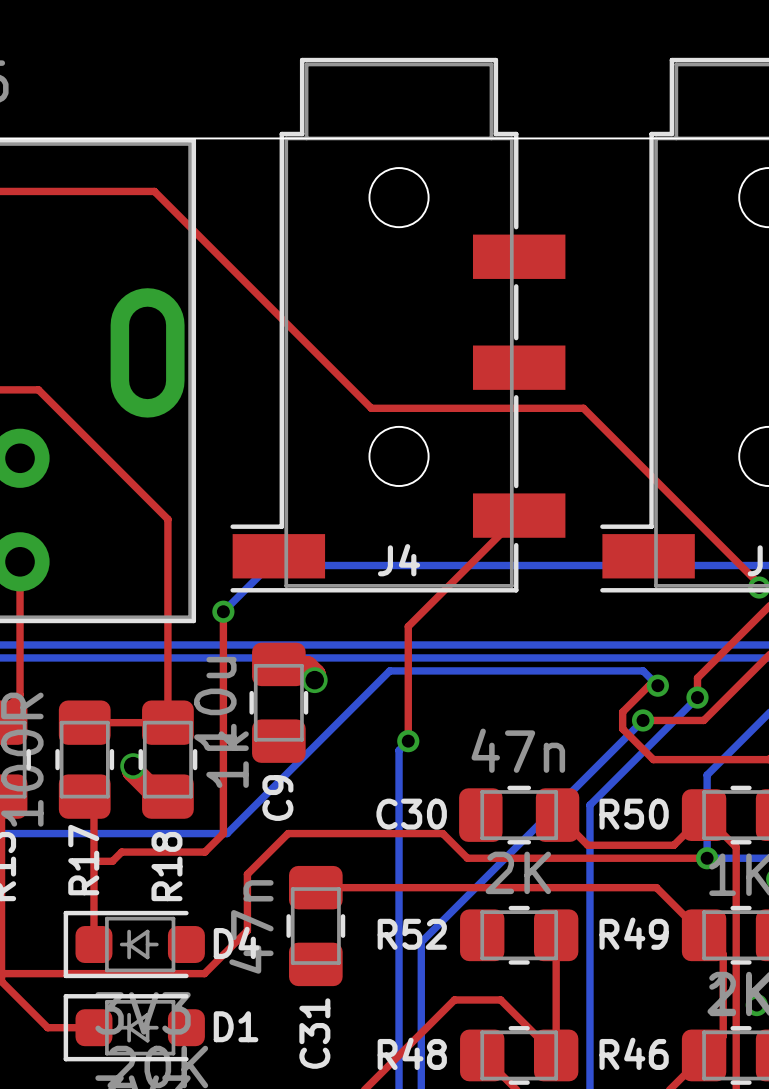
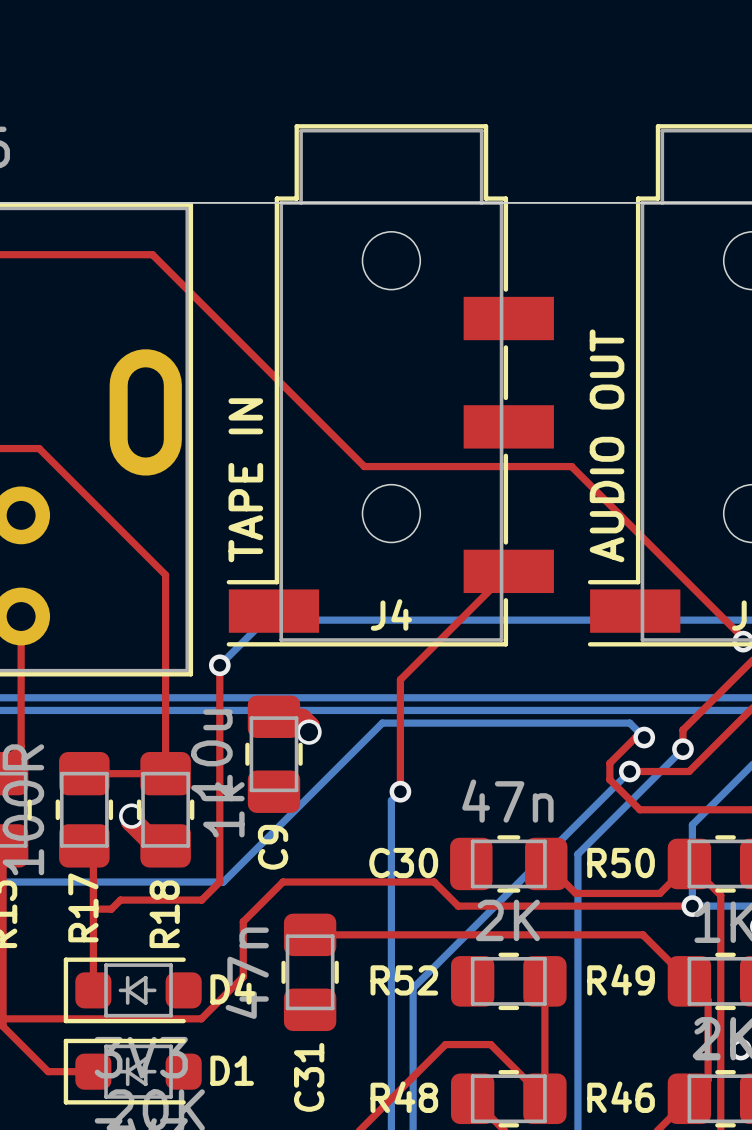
text: none -> AUDIO OUT (607, 445)
text: none -> TAPE IN (245, 480)

